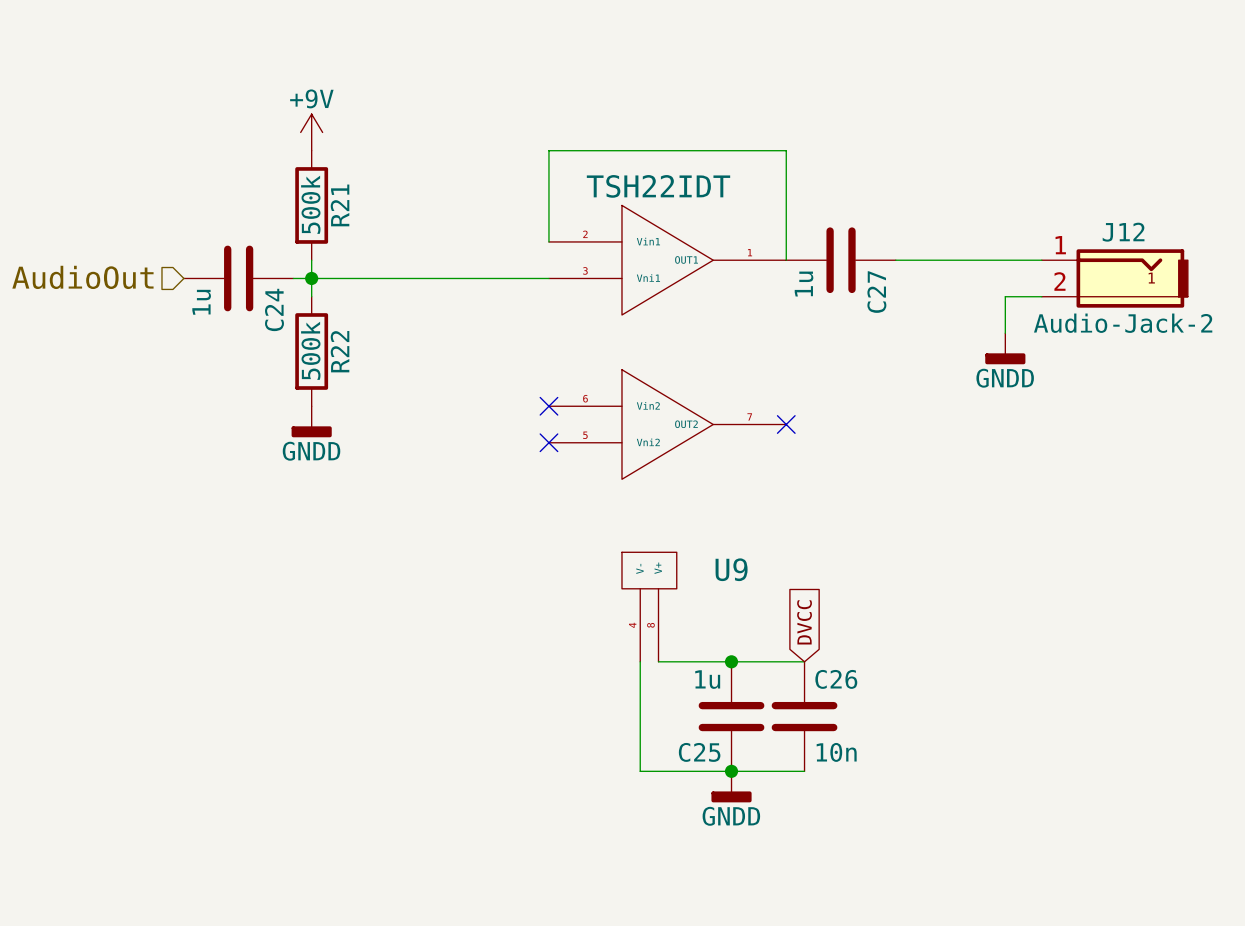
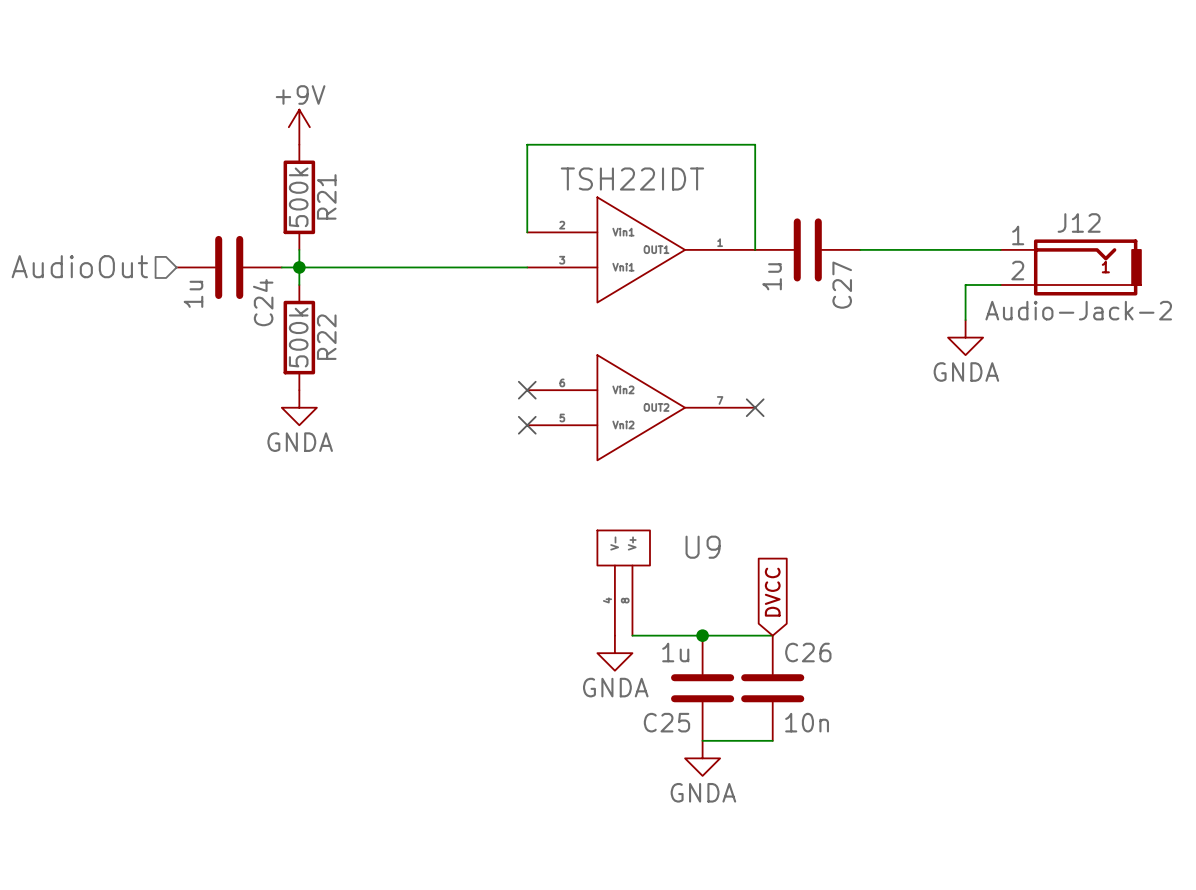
power symbol: GNDD (1005, 348) -> GNDA (965, 337)
power symbol: GNDD (311, 421) -> GNDA (299, 407)
wire: (640, 661) (640, 771) (731, 771) -> none
power symbol: none -> GNDA (614, 653)
junction: (731, 771) -> none
power symbol: GNDD (731, 786) -> GNDA (702, 758)

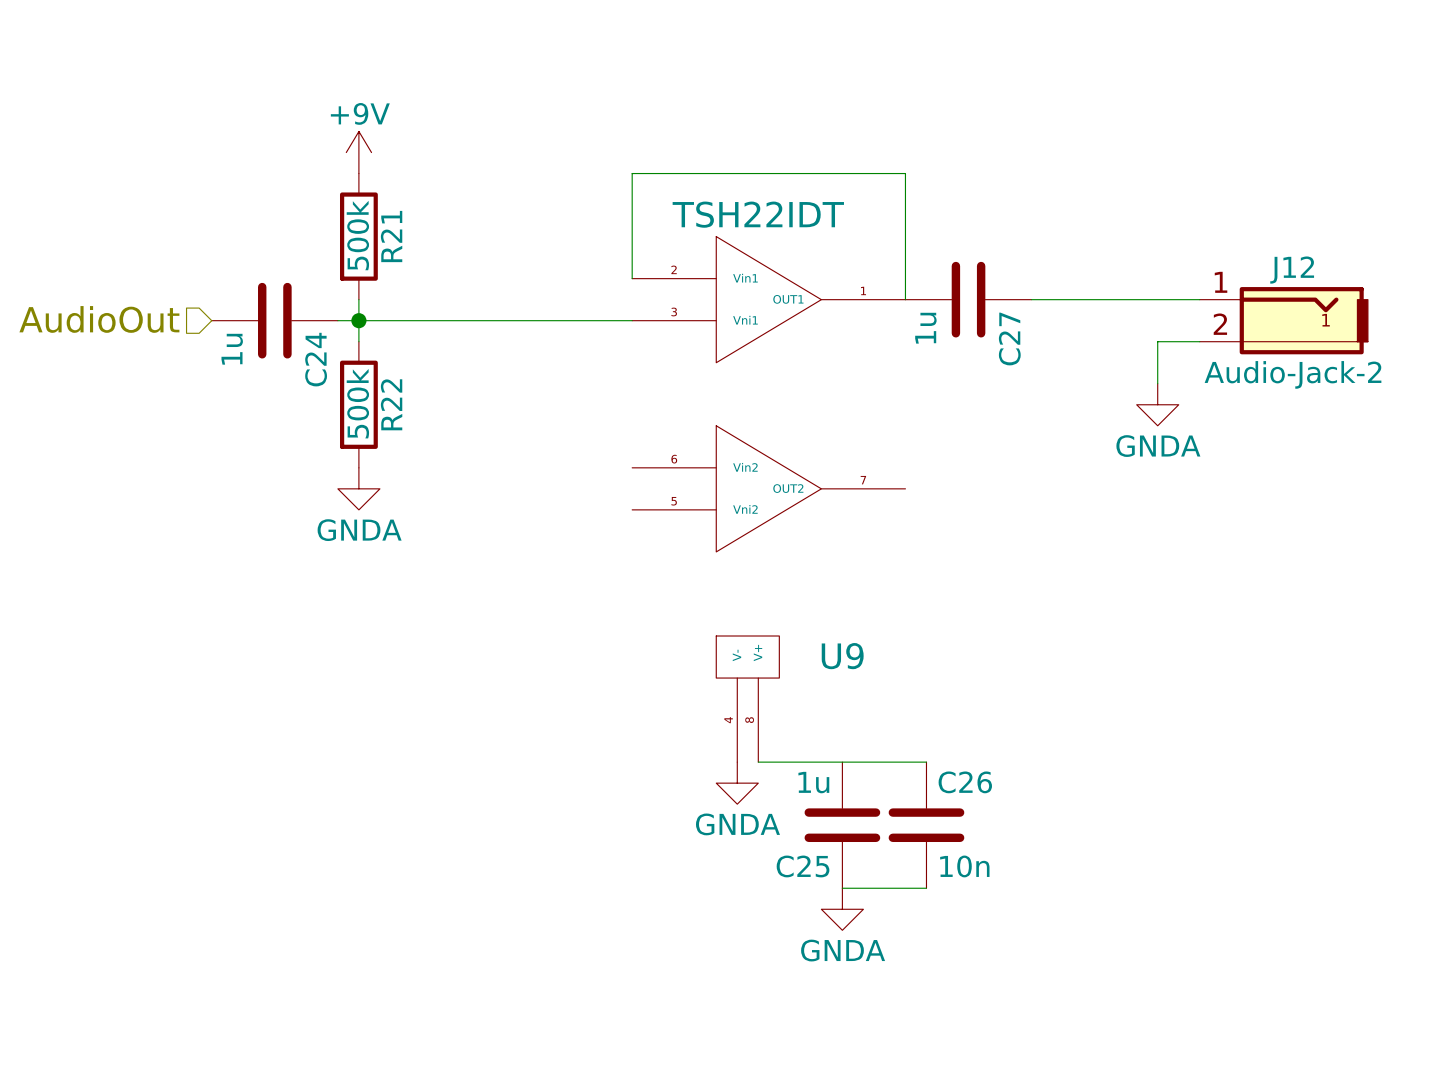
no-connect mark: (527, 390) -> none
no-connect mark: (755, 407) -> none
no-connect mark: (527, 425) -> none
global label: DVCC (772, 592) -> none
junction: (702, 635) -> none

